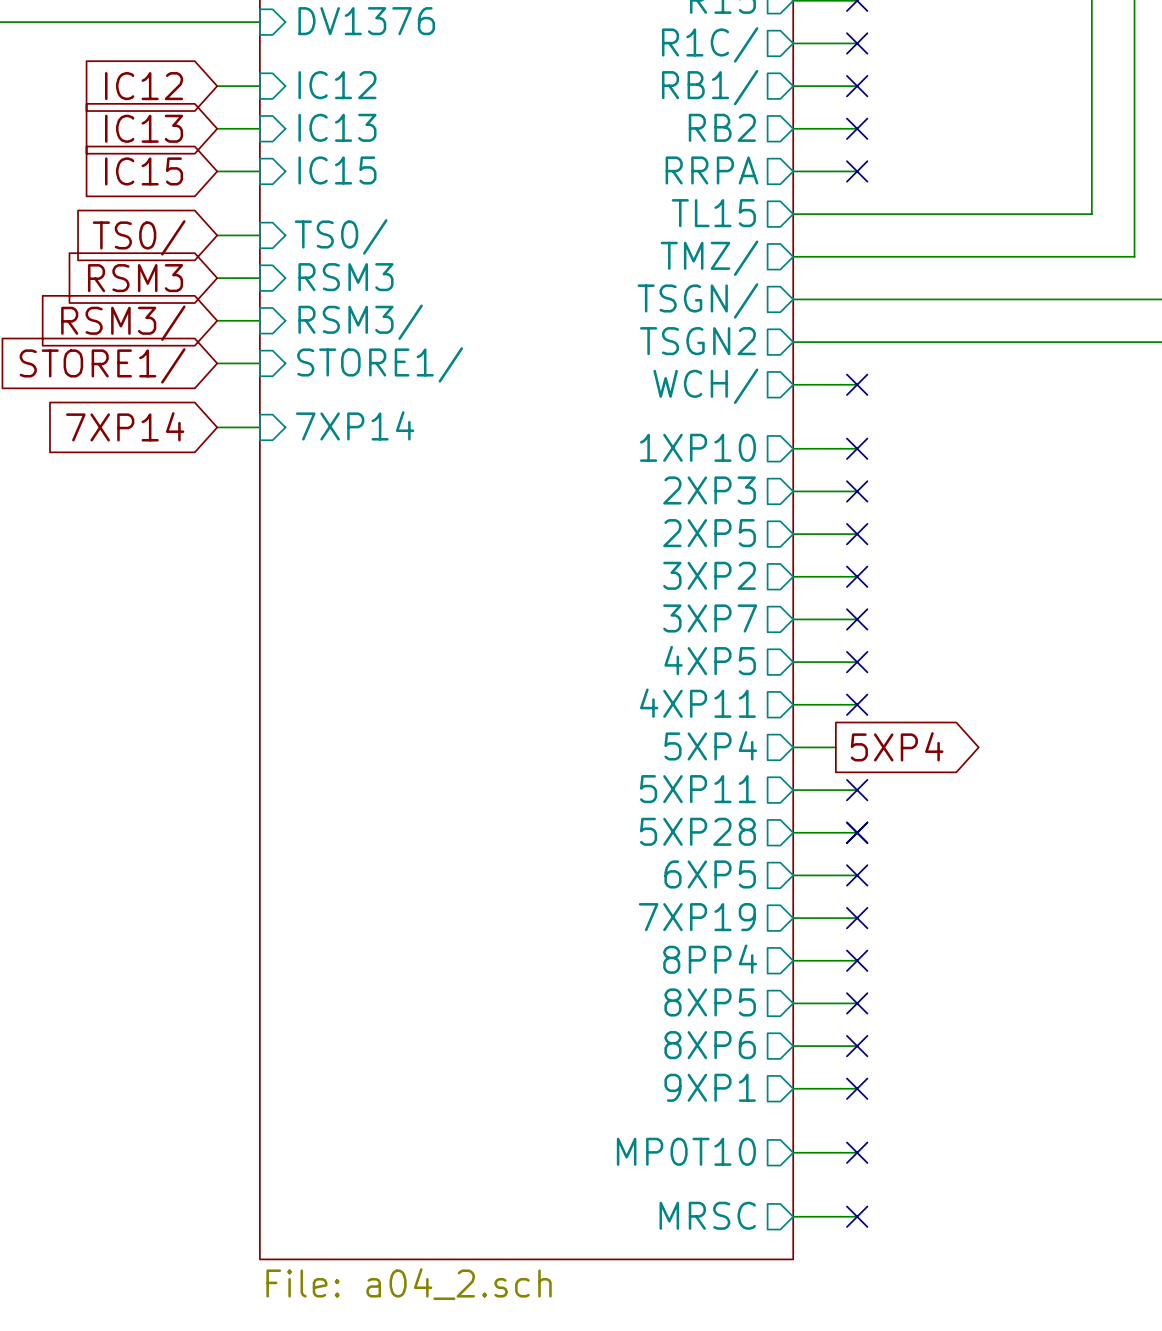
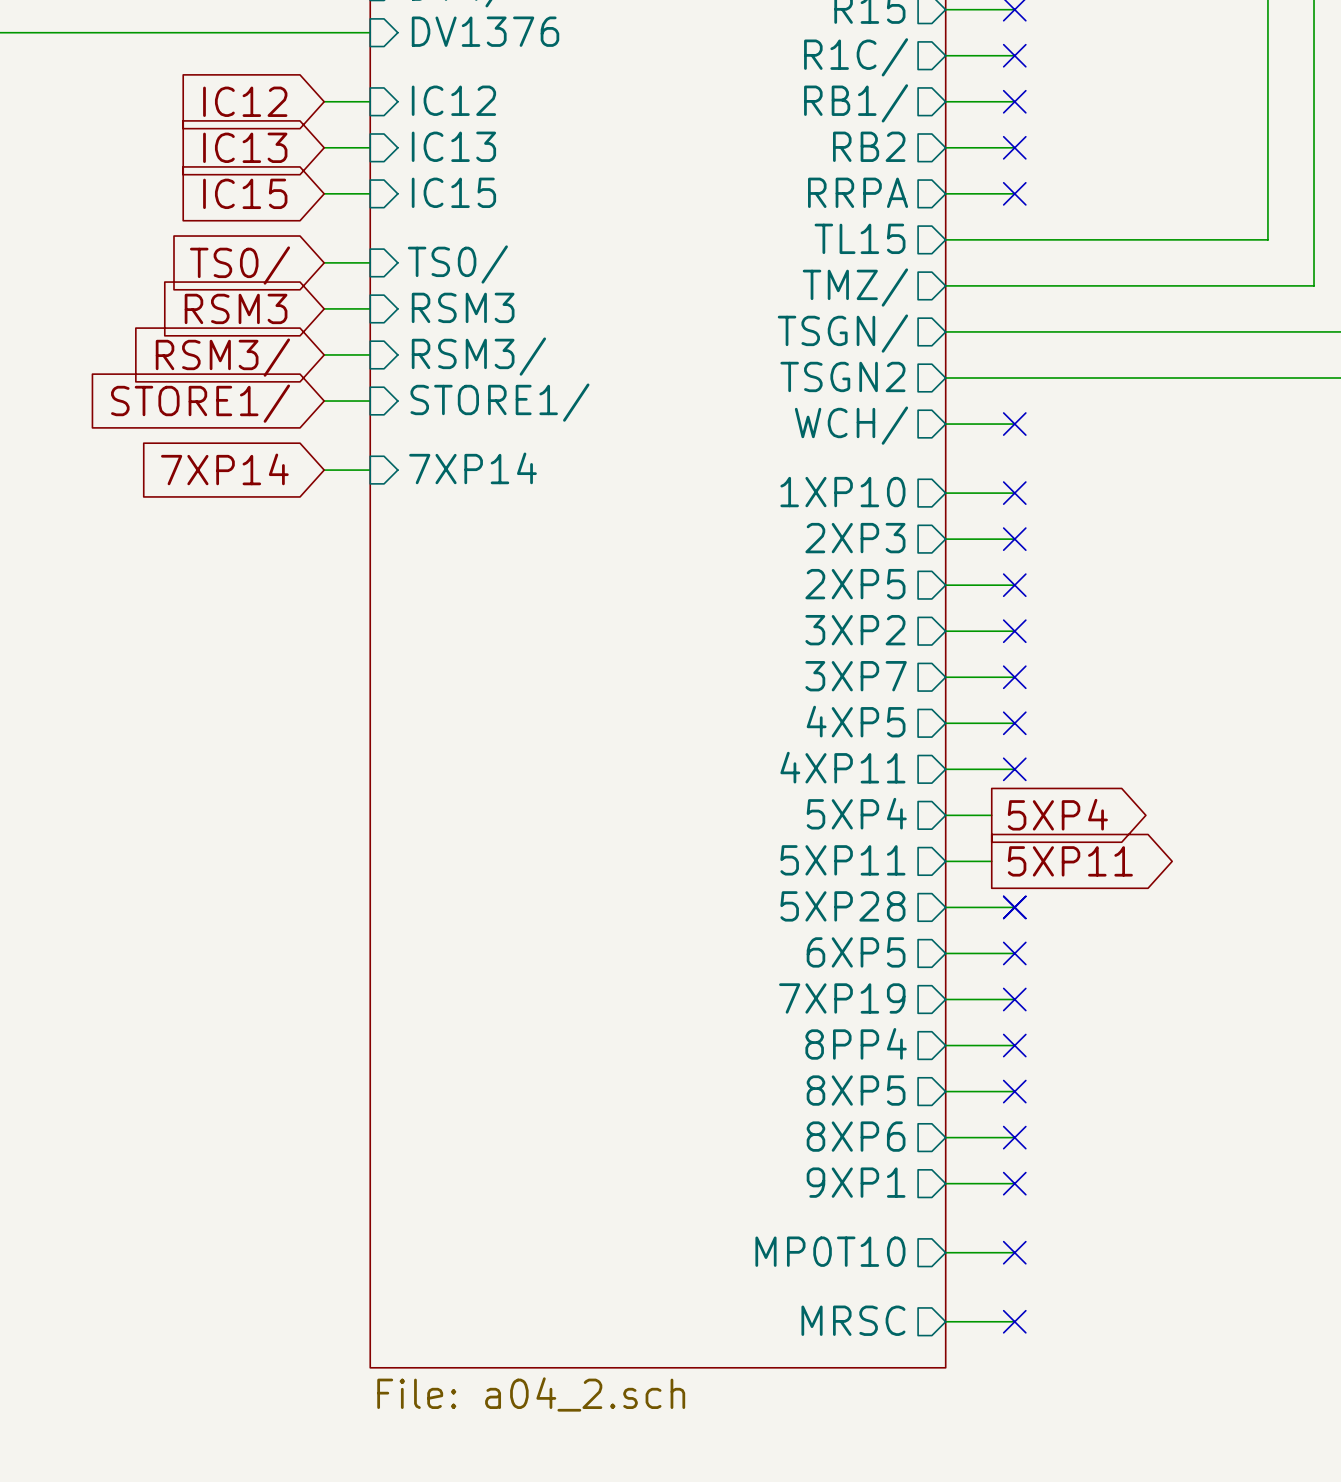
wire: (835, 790) (857, 790) -> none
no-connect mark: (857, 790) -> none
global label: none -> 5XP11 (1070, 861)

